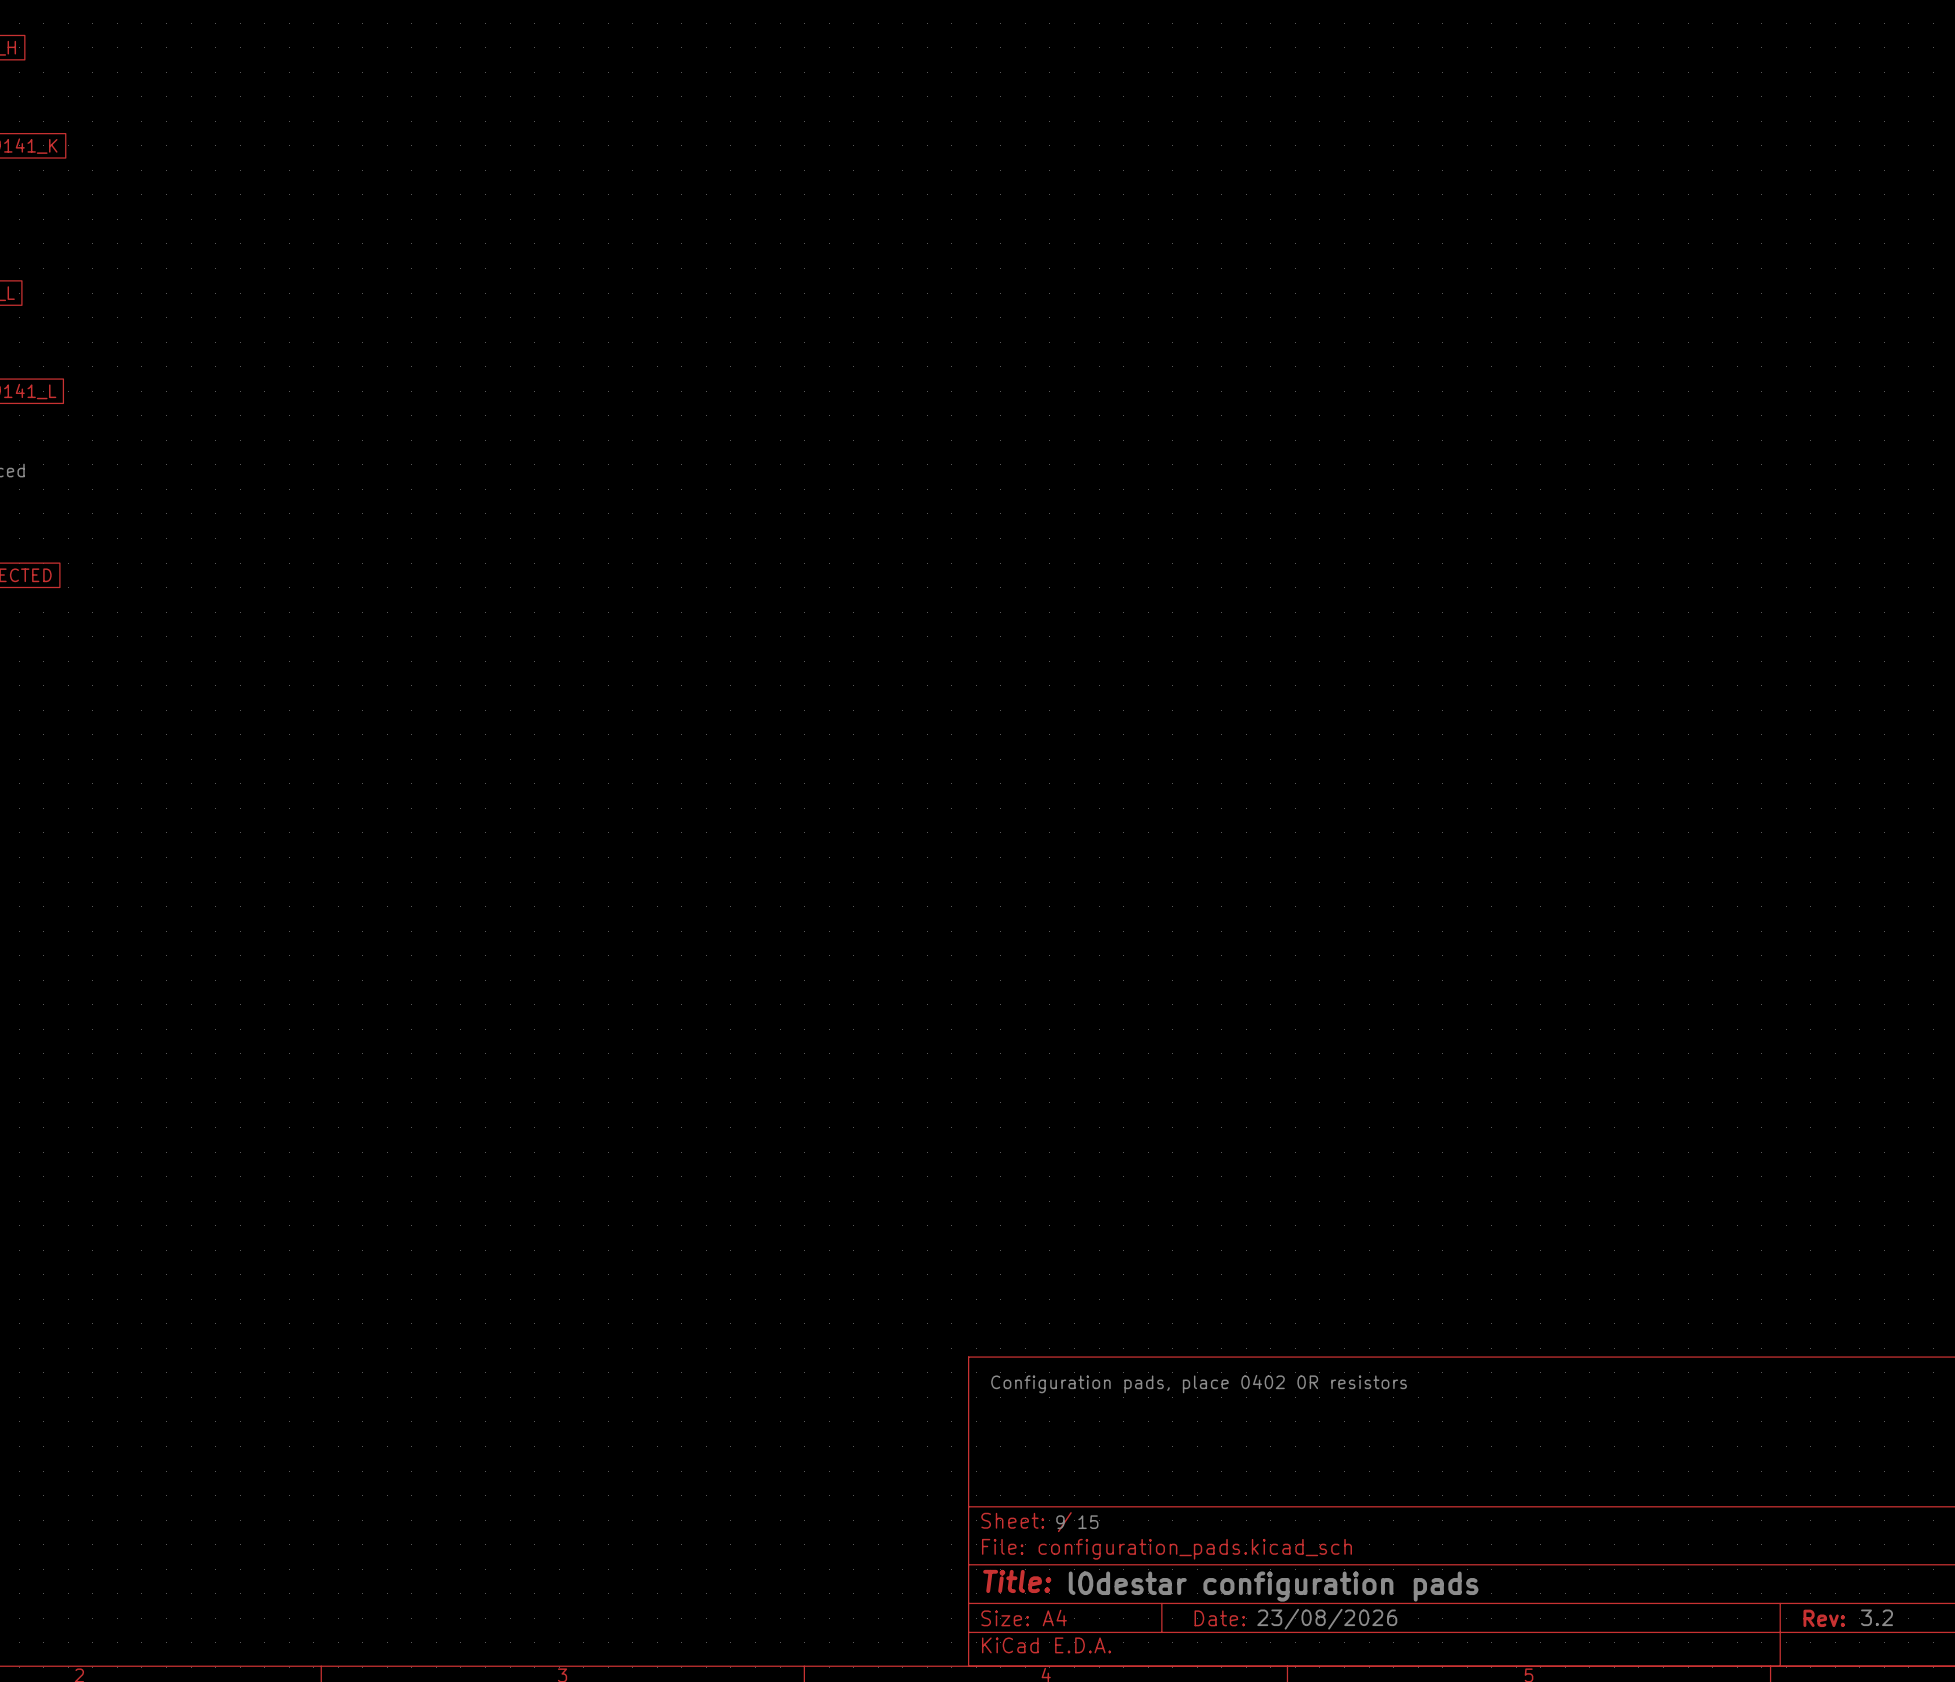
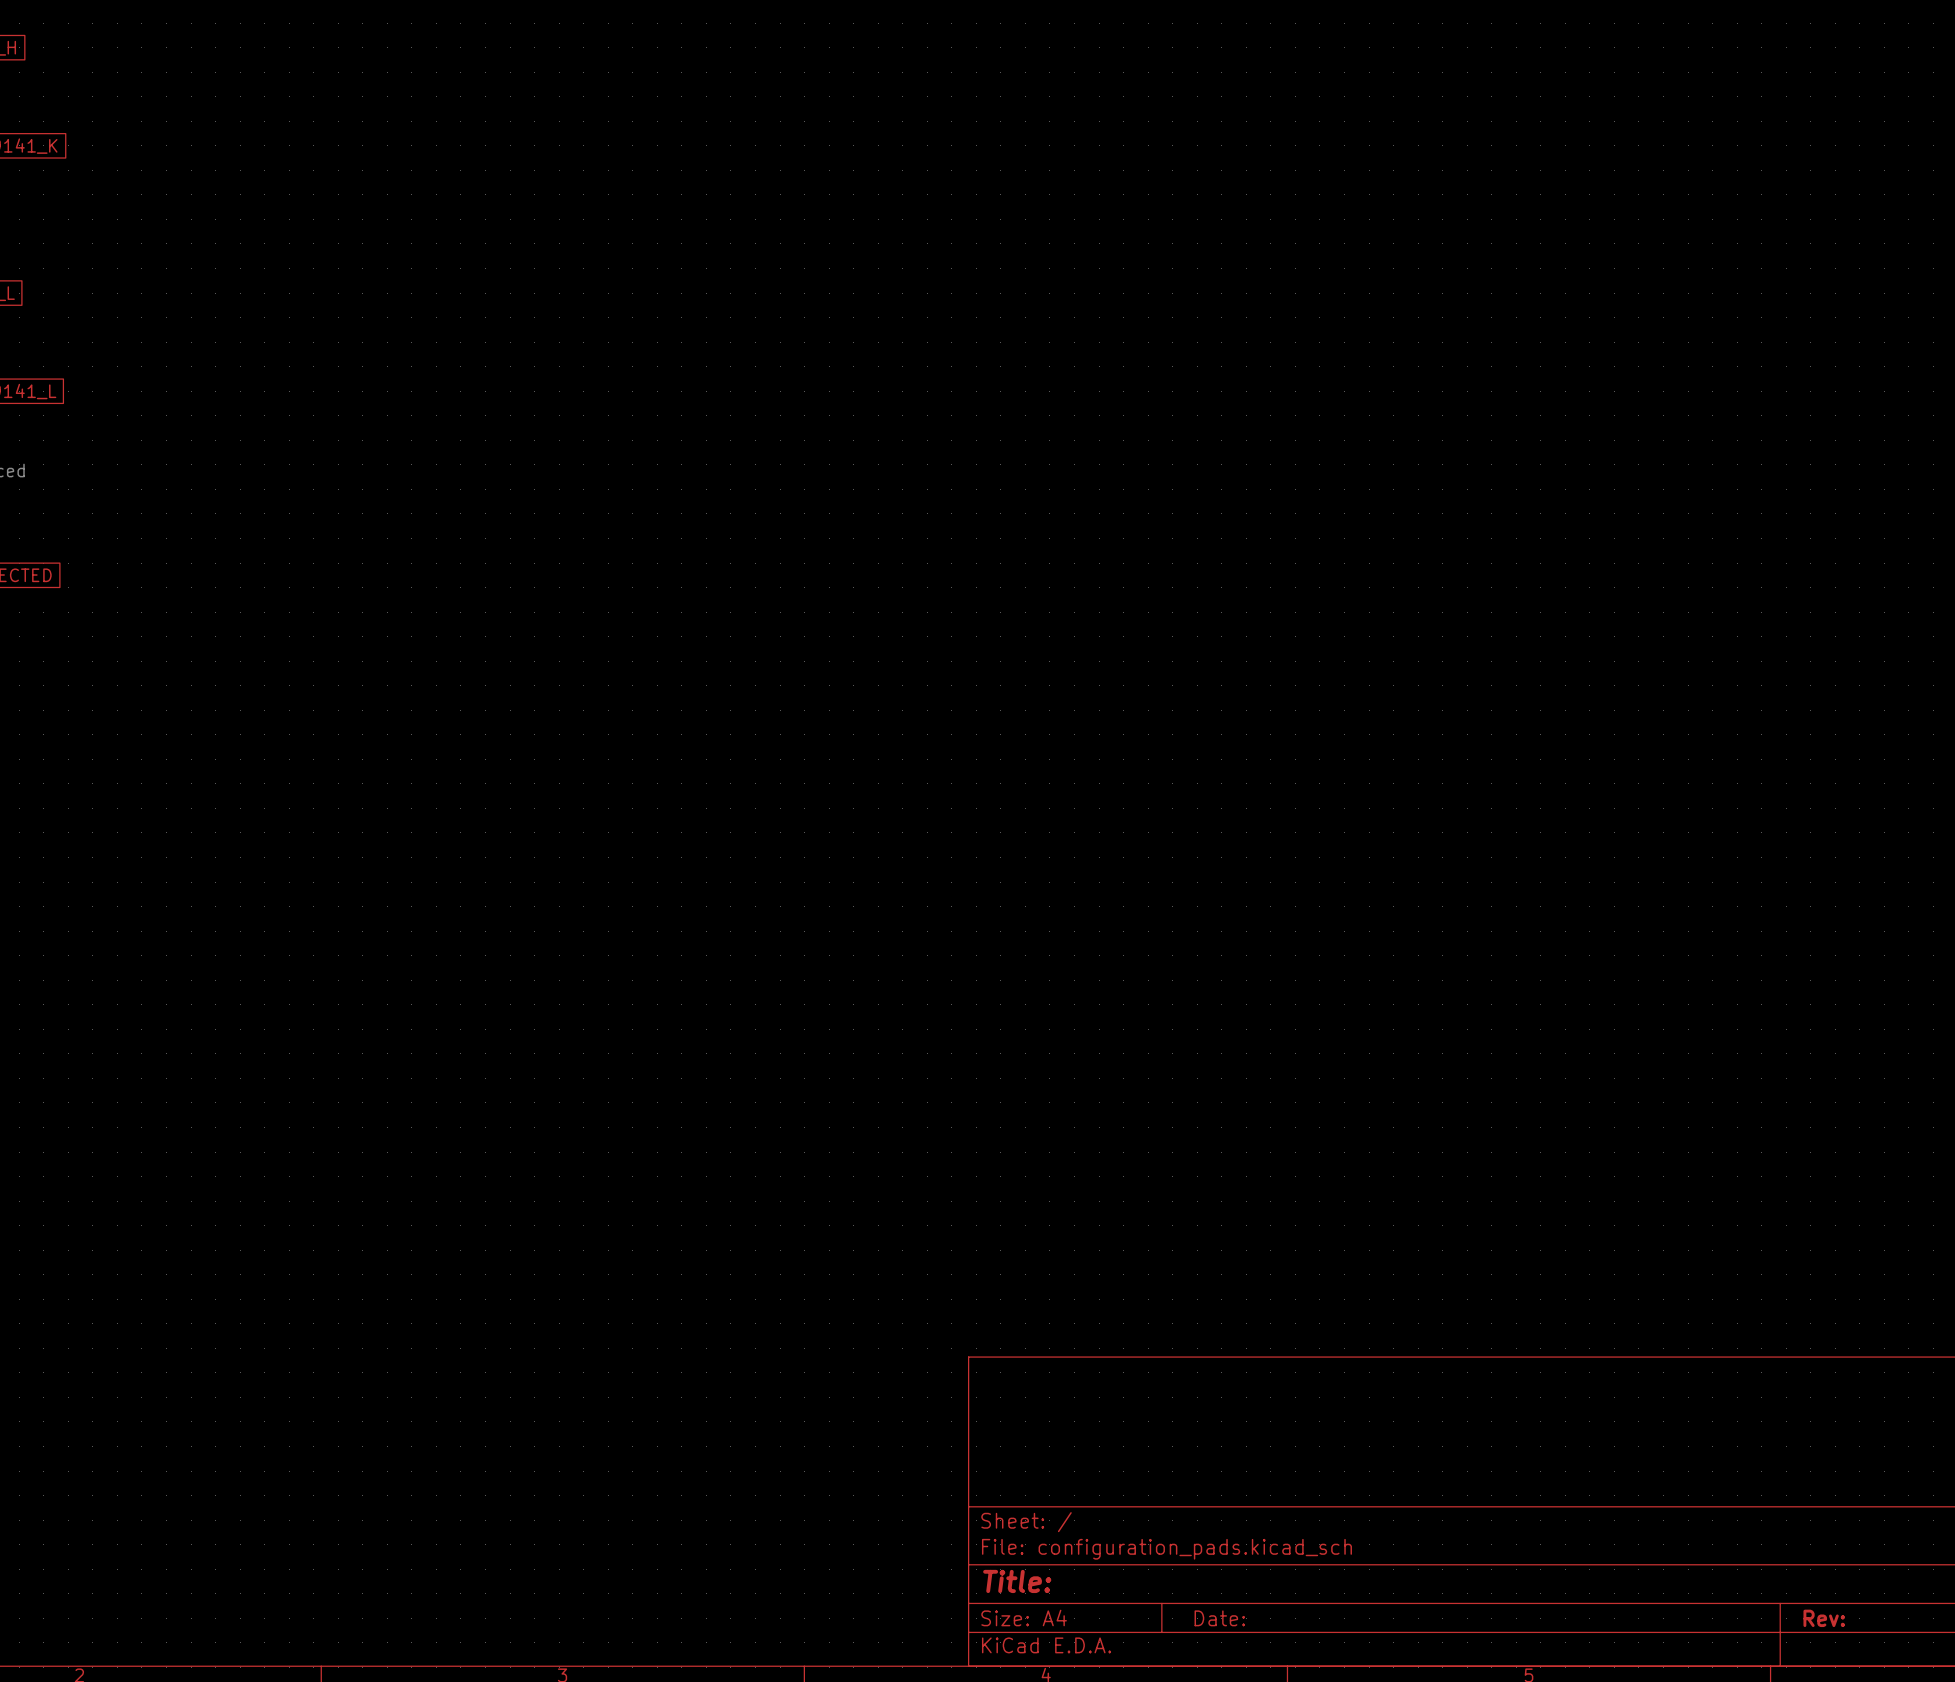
text: Configuration pads, place 0402 0R resistors (1199, 1384) -> none
text: 9 (1060, 1522) -> none
text: 15 (1088, 1522) -> none
text: l0destar configuration pads (1273, 1586) -> none
text: 3.2 (1877, 1617) -> none
text: 23/08/2026 (1327, 1619) -> none

